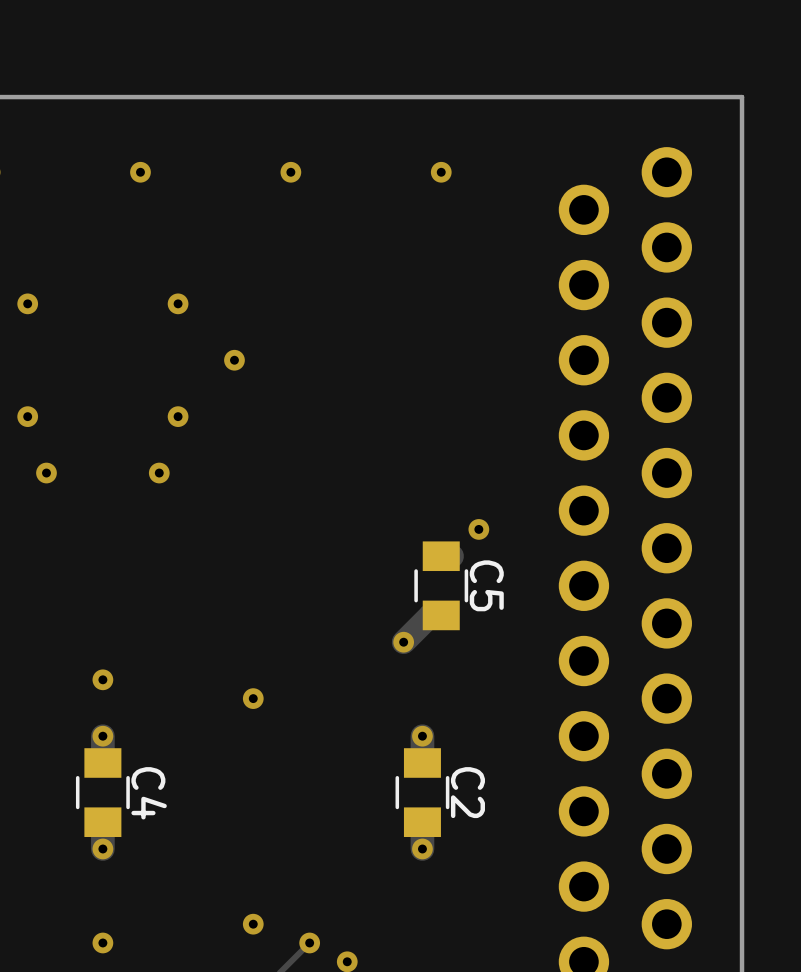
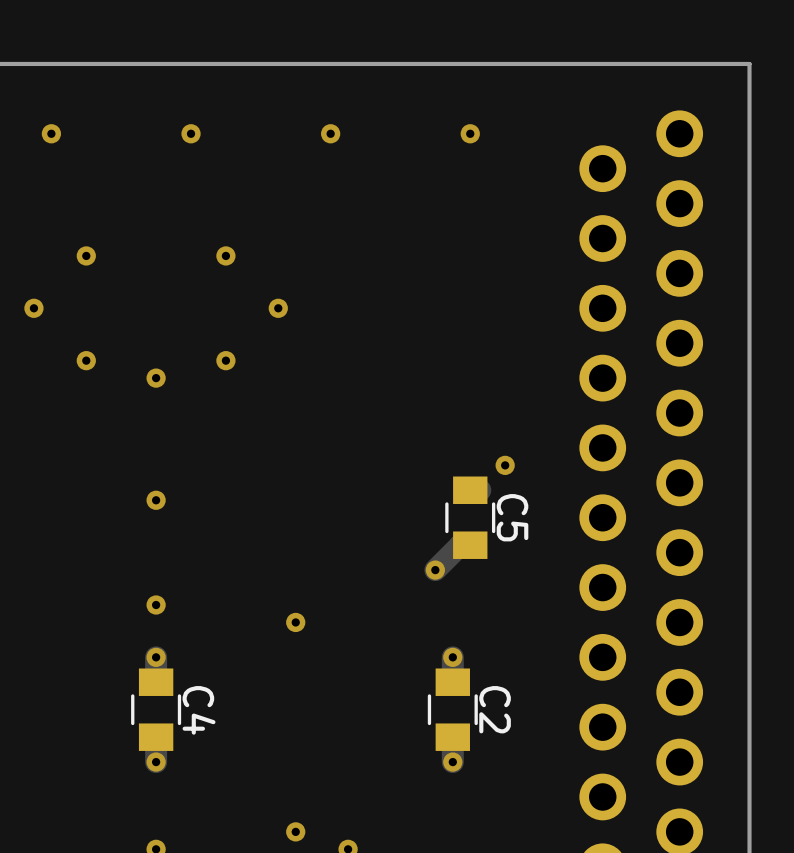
via: none -> (156, 378)
via: (46, 473) -> none
via: (159, 473) -> none
via: none -> (156, 500)

